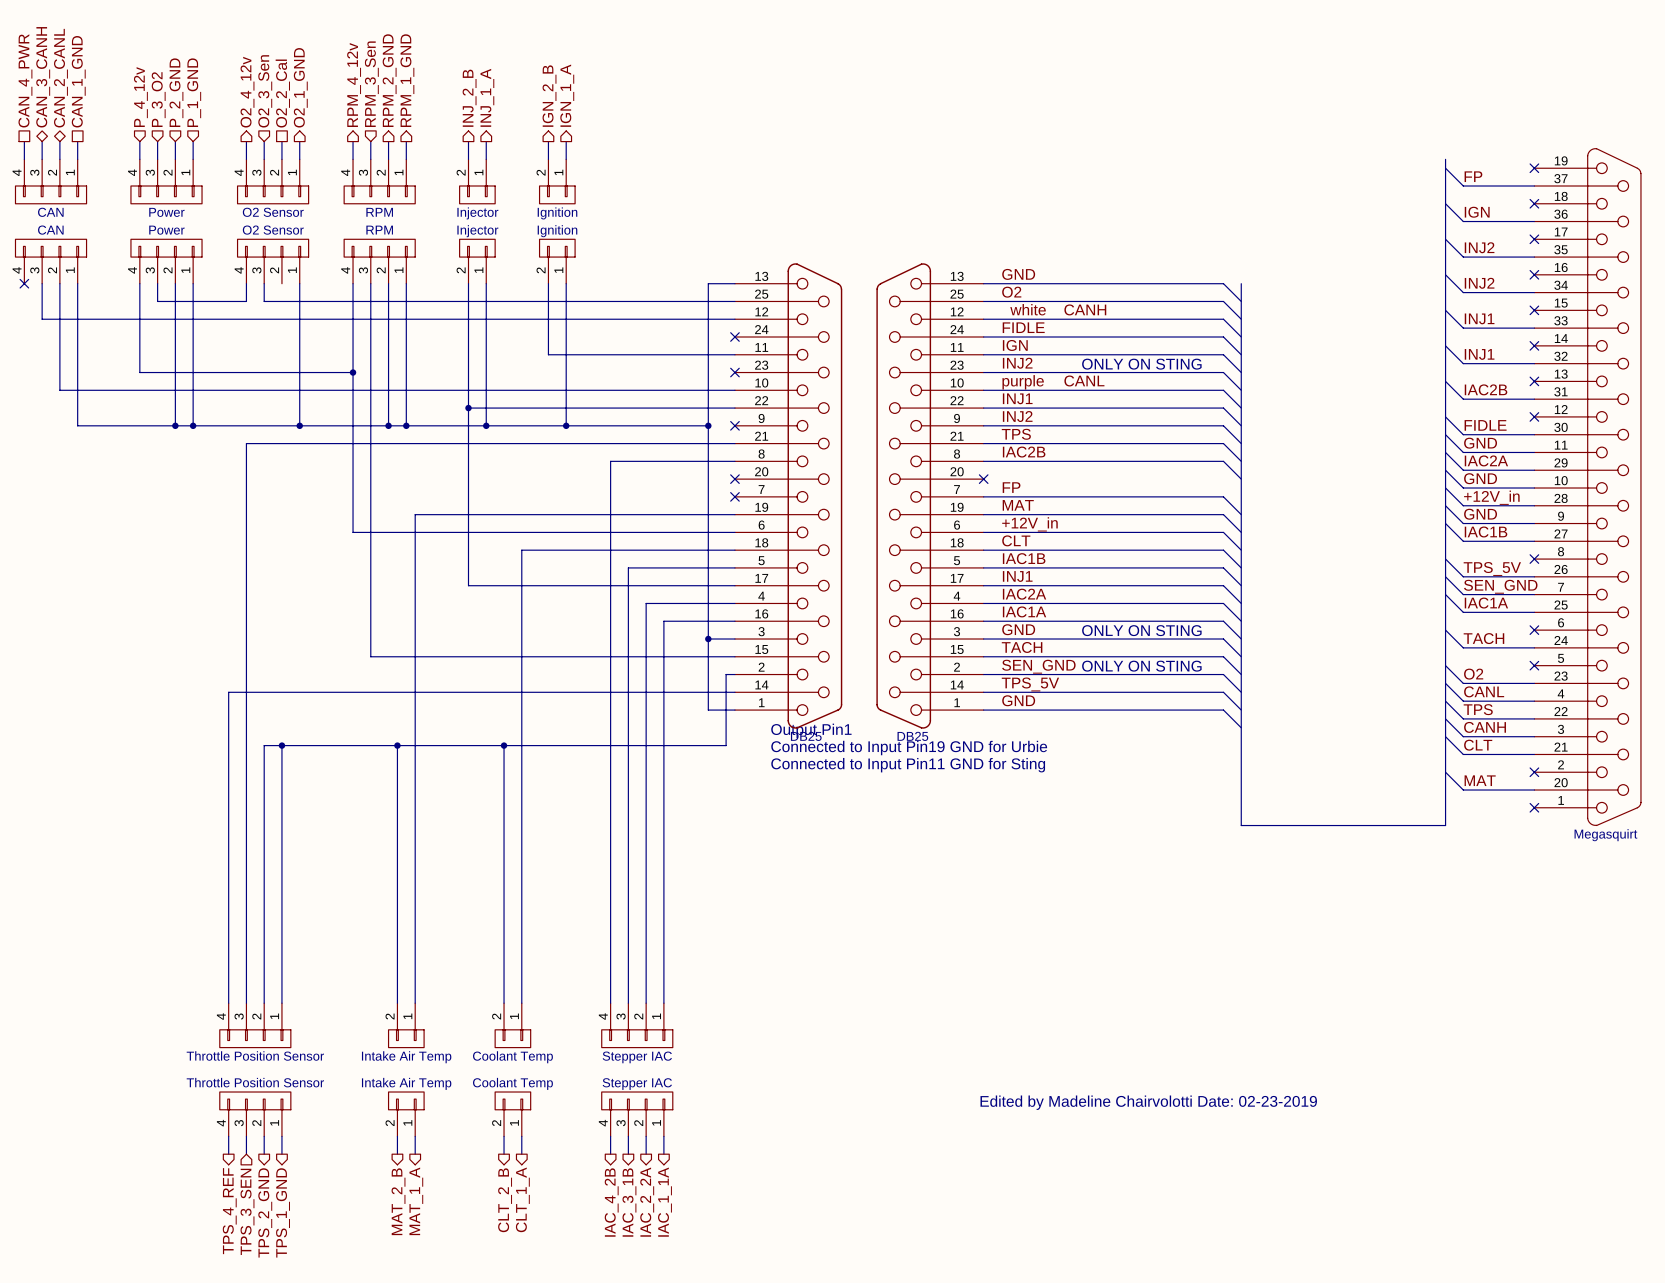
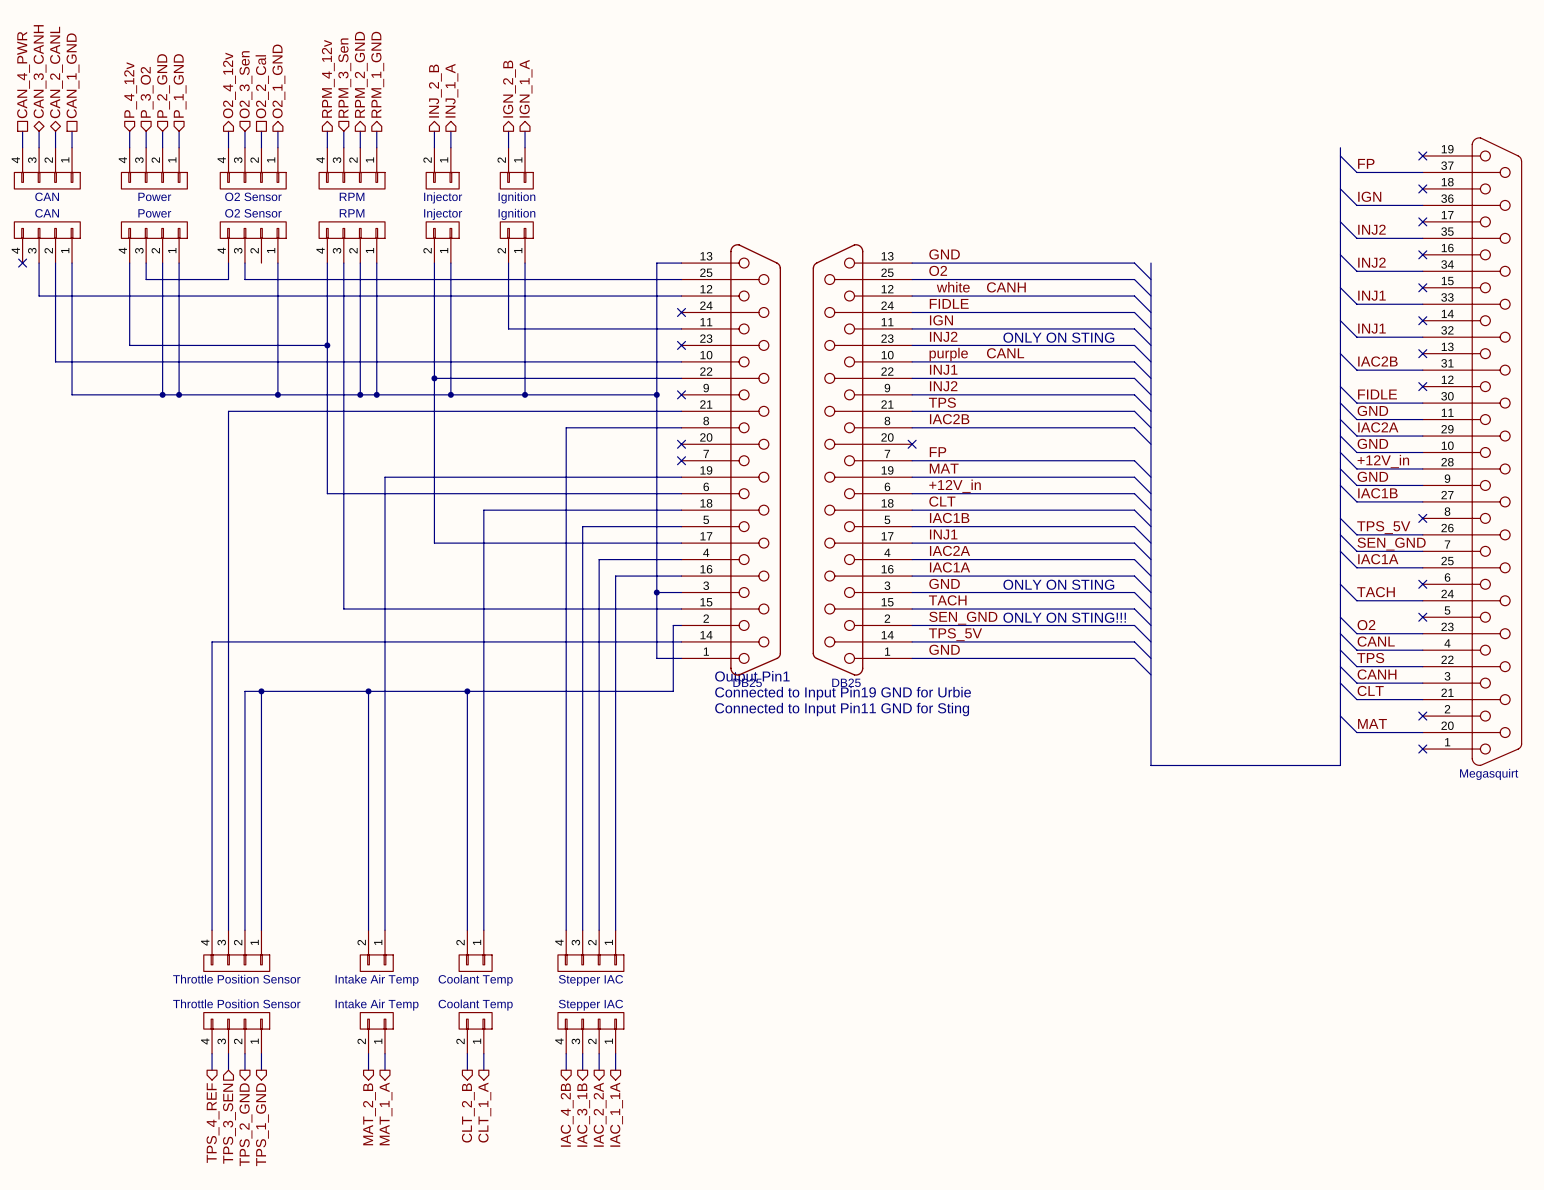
text: ONLY ON STING (1141, 666) -> ONLY ON STING!!! (1064, 617)
text: Edited by Madeline Chairvolotti Date: 02-23-2019 (1148, 1102) -> none

